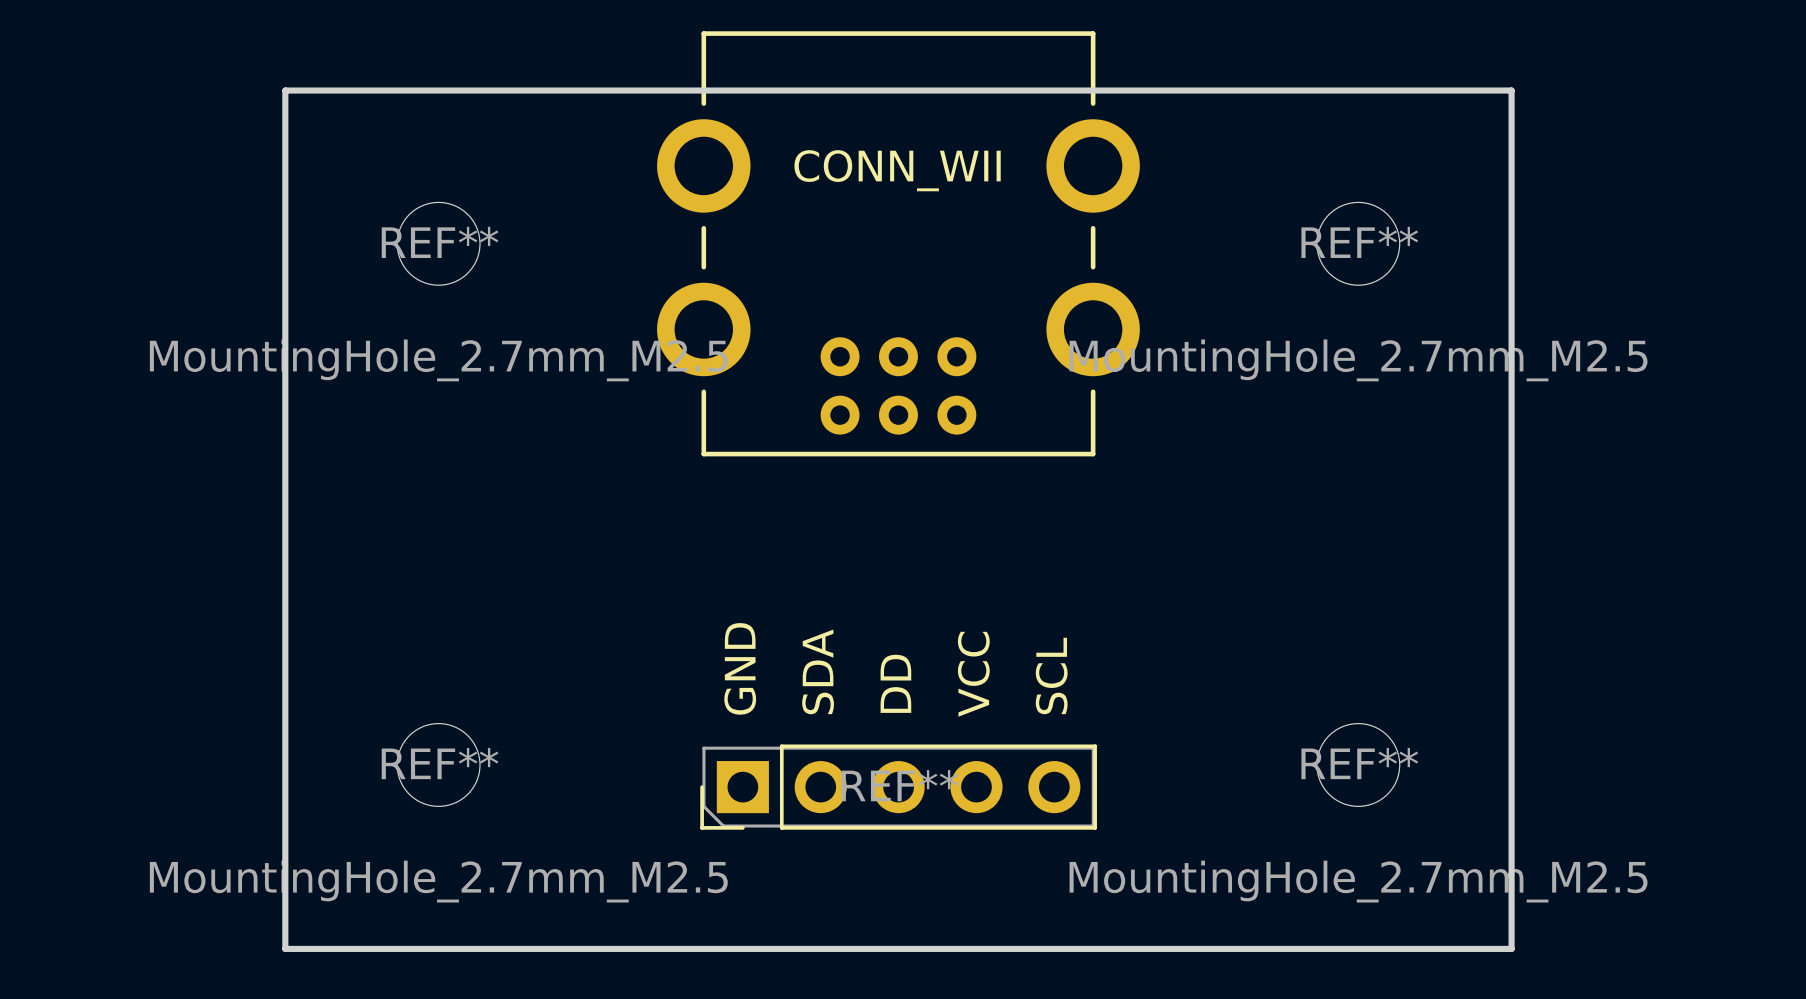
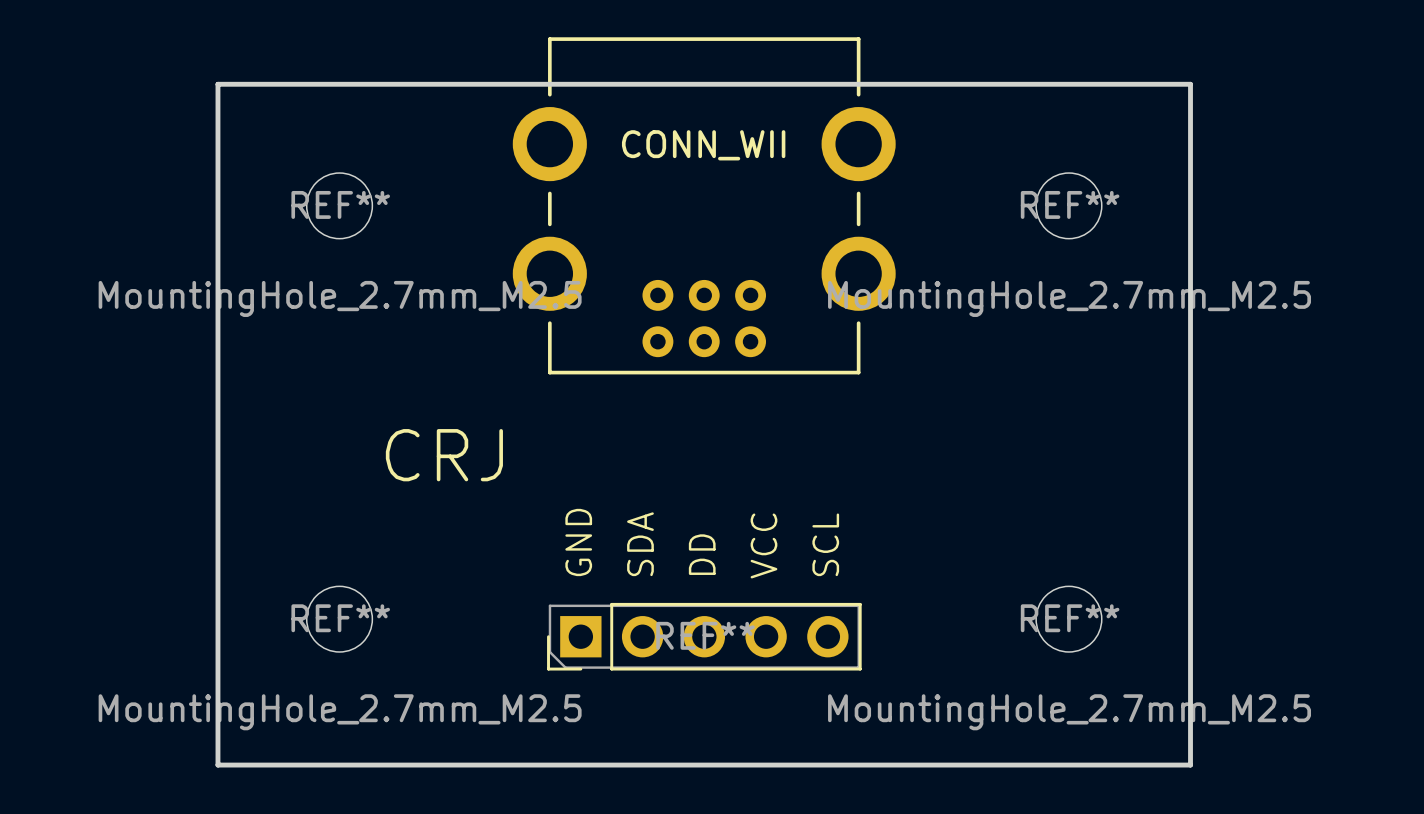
text: none -> CRJ (444, 455)

